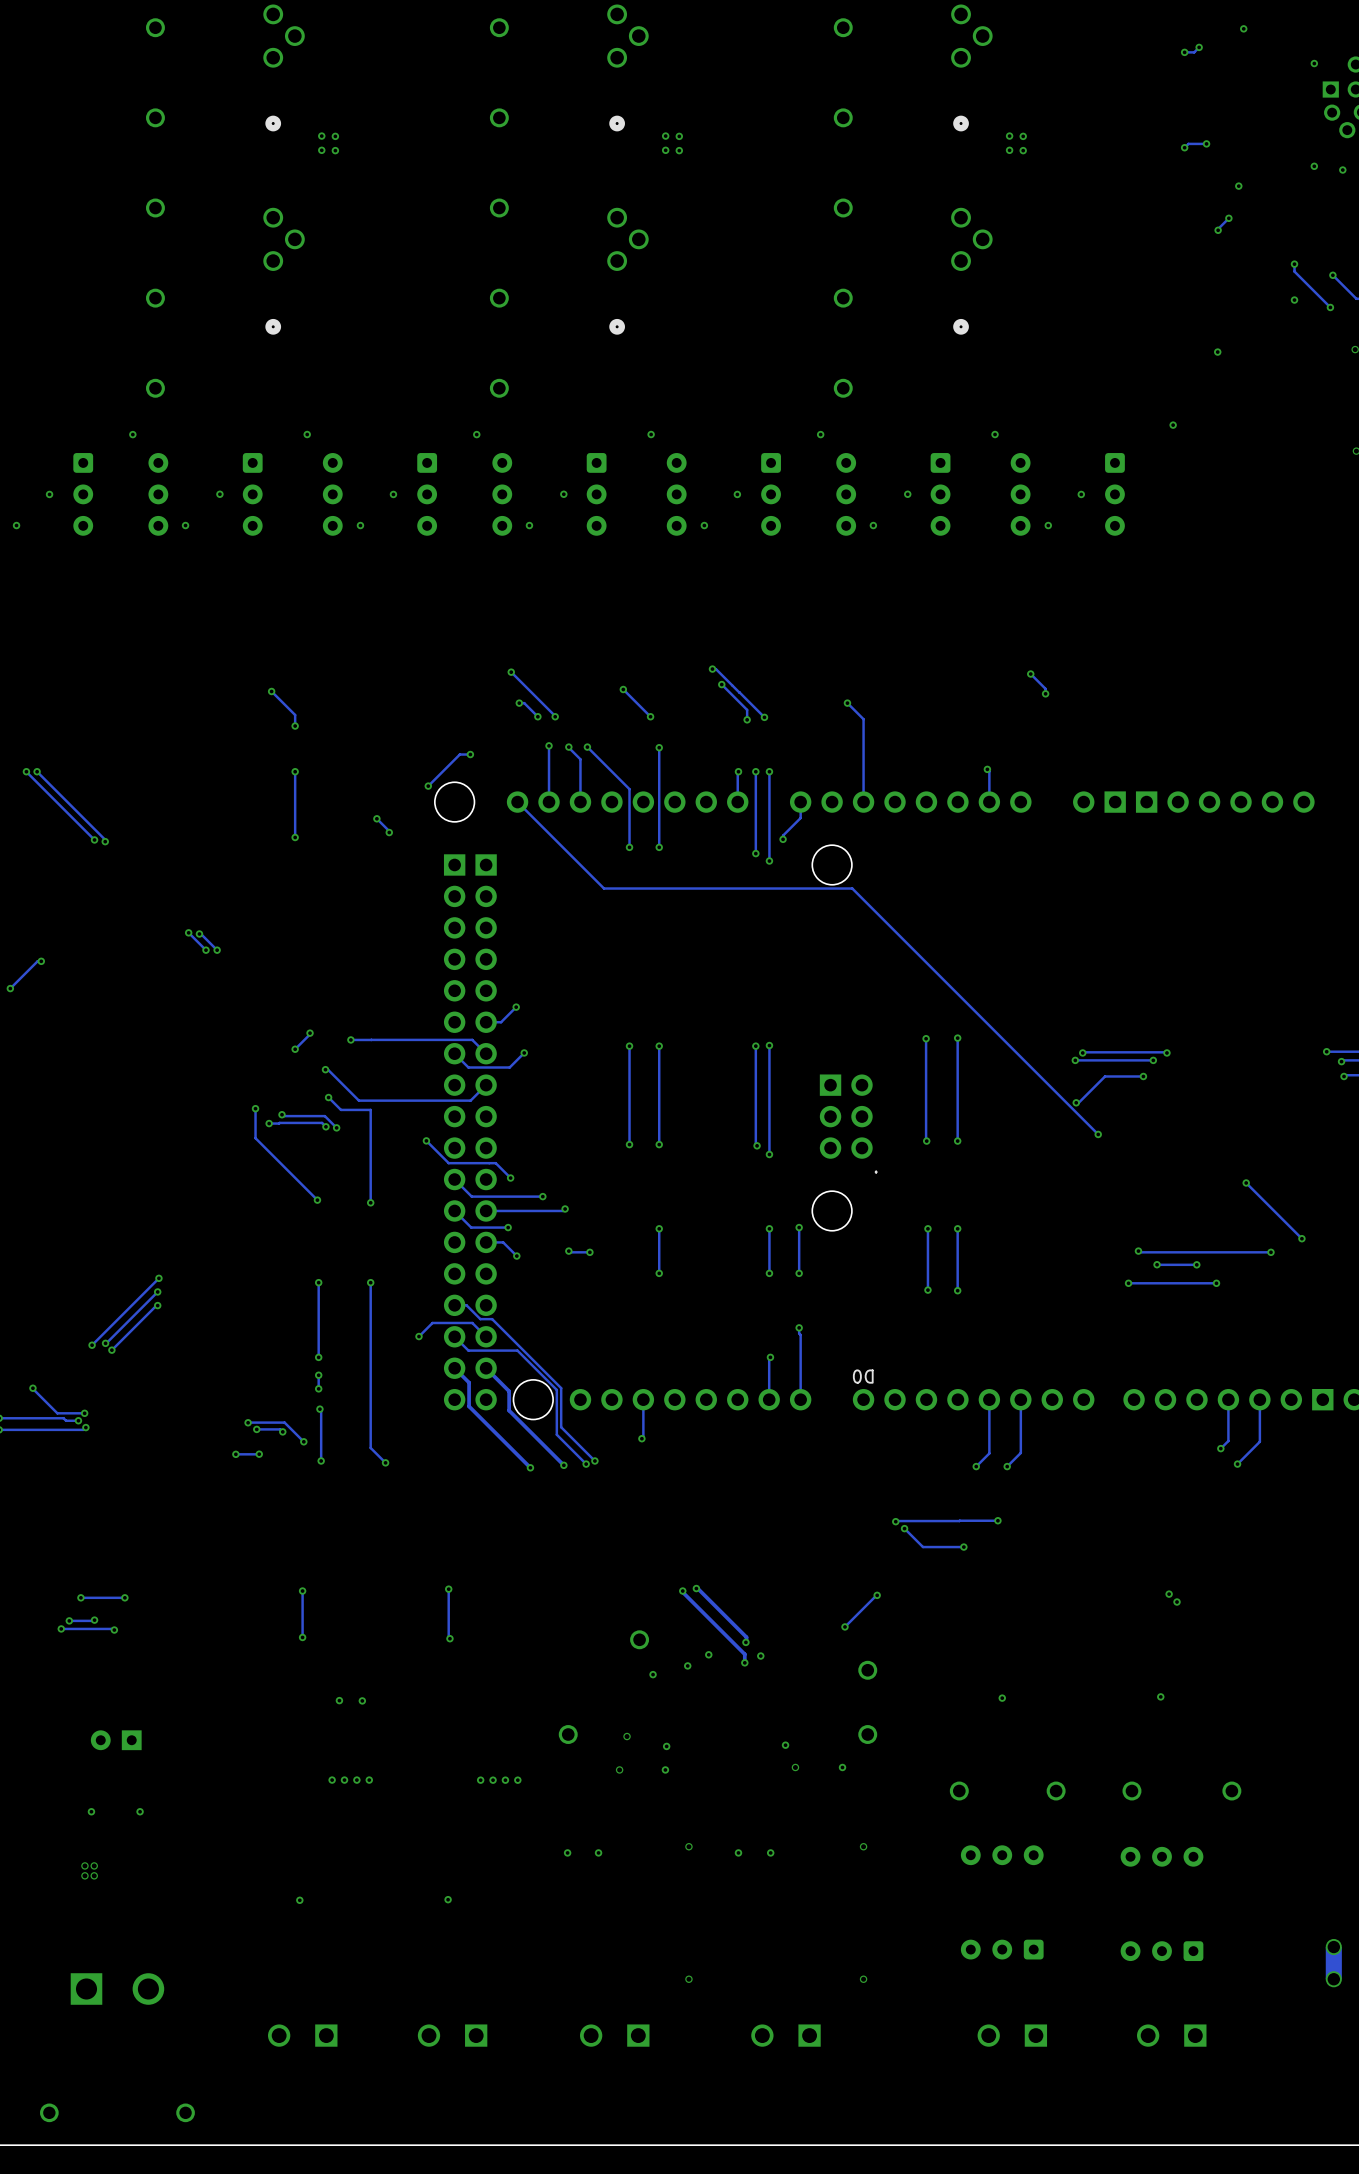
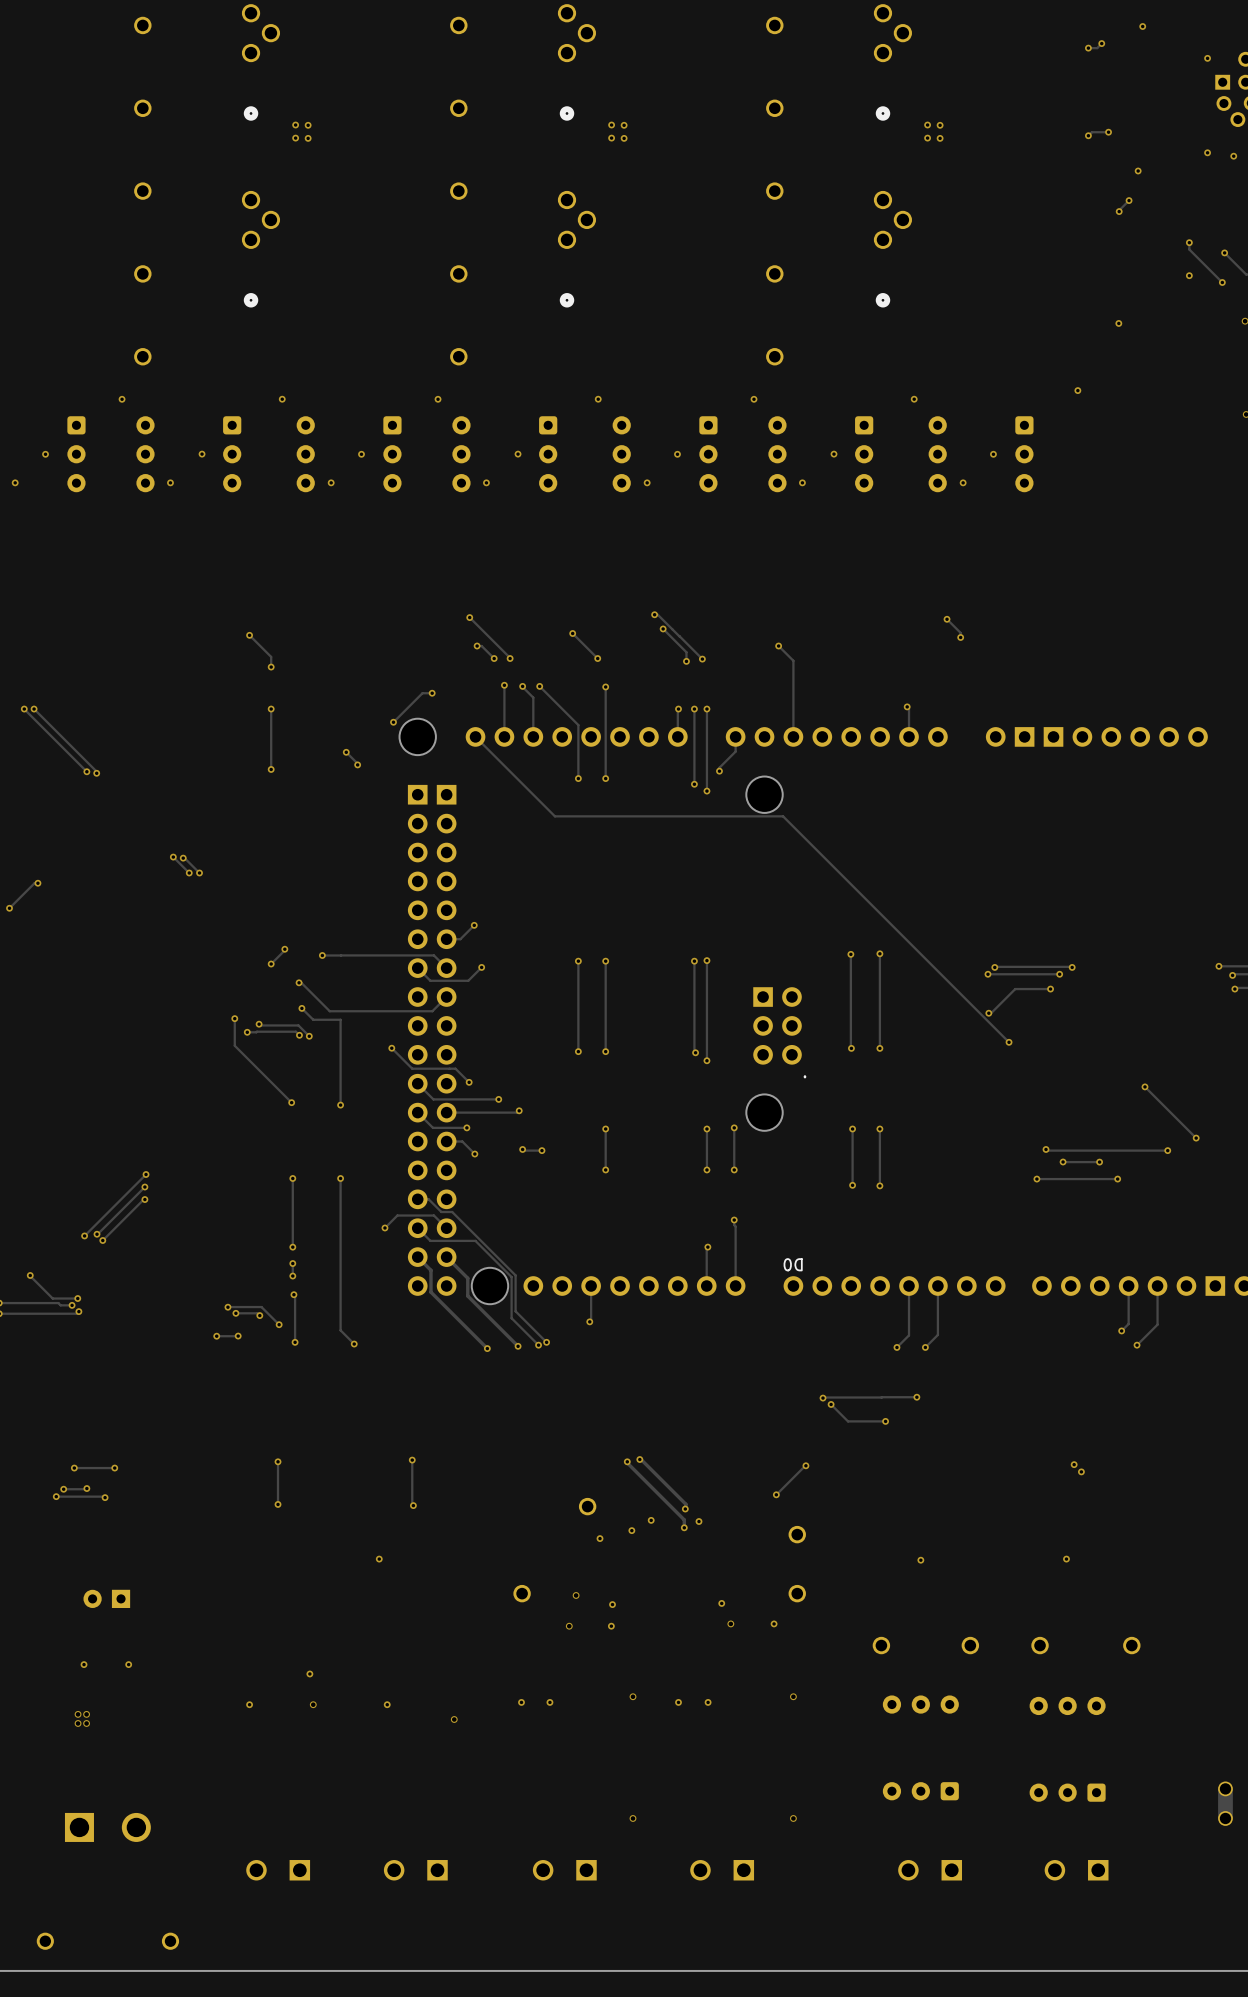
via: none -> (379, 1559)
via: (339, 1700) -> none
via: (362, 1700) -> none
via: (332, 1780) -> none
via: (344, 1780) -> none
via: (356, 1780) -> none
via: (369, 1780) -> none
via: (480, 1780) -> none
via: (493, 1780) -> none
via: (505, 1780) -> none
via: (517, 1780) -> none
via: none -> (309, 1673)
via: none -> (249, 1704)
via: none -> (313, 1704)
via: none -> (387, 1704)
via: none -> (454, 1719)
via: (448, 1899) -> none
via: (299, 1900) -> none

